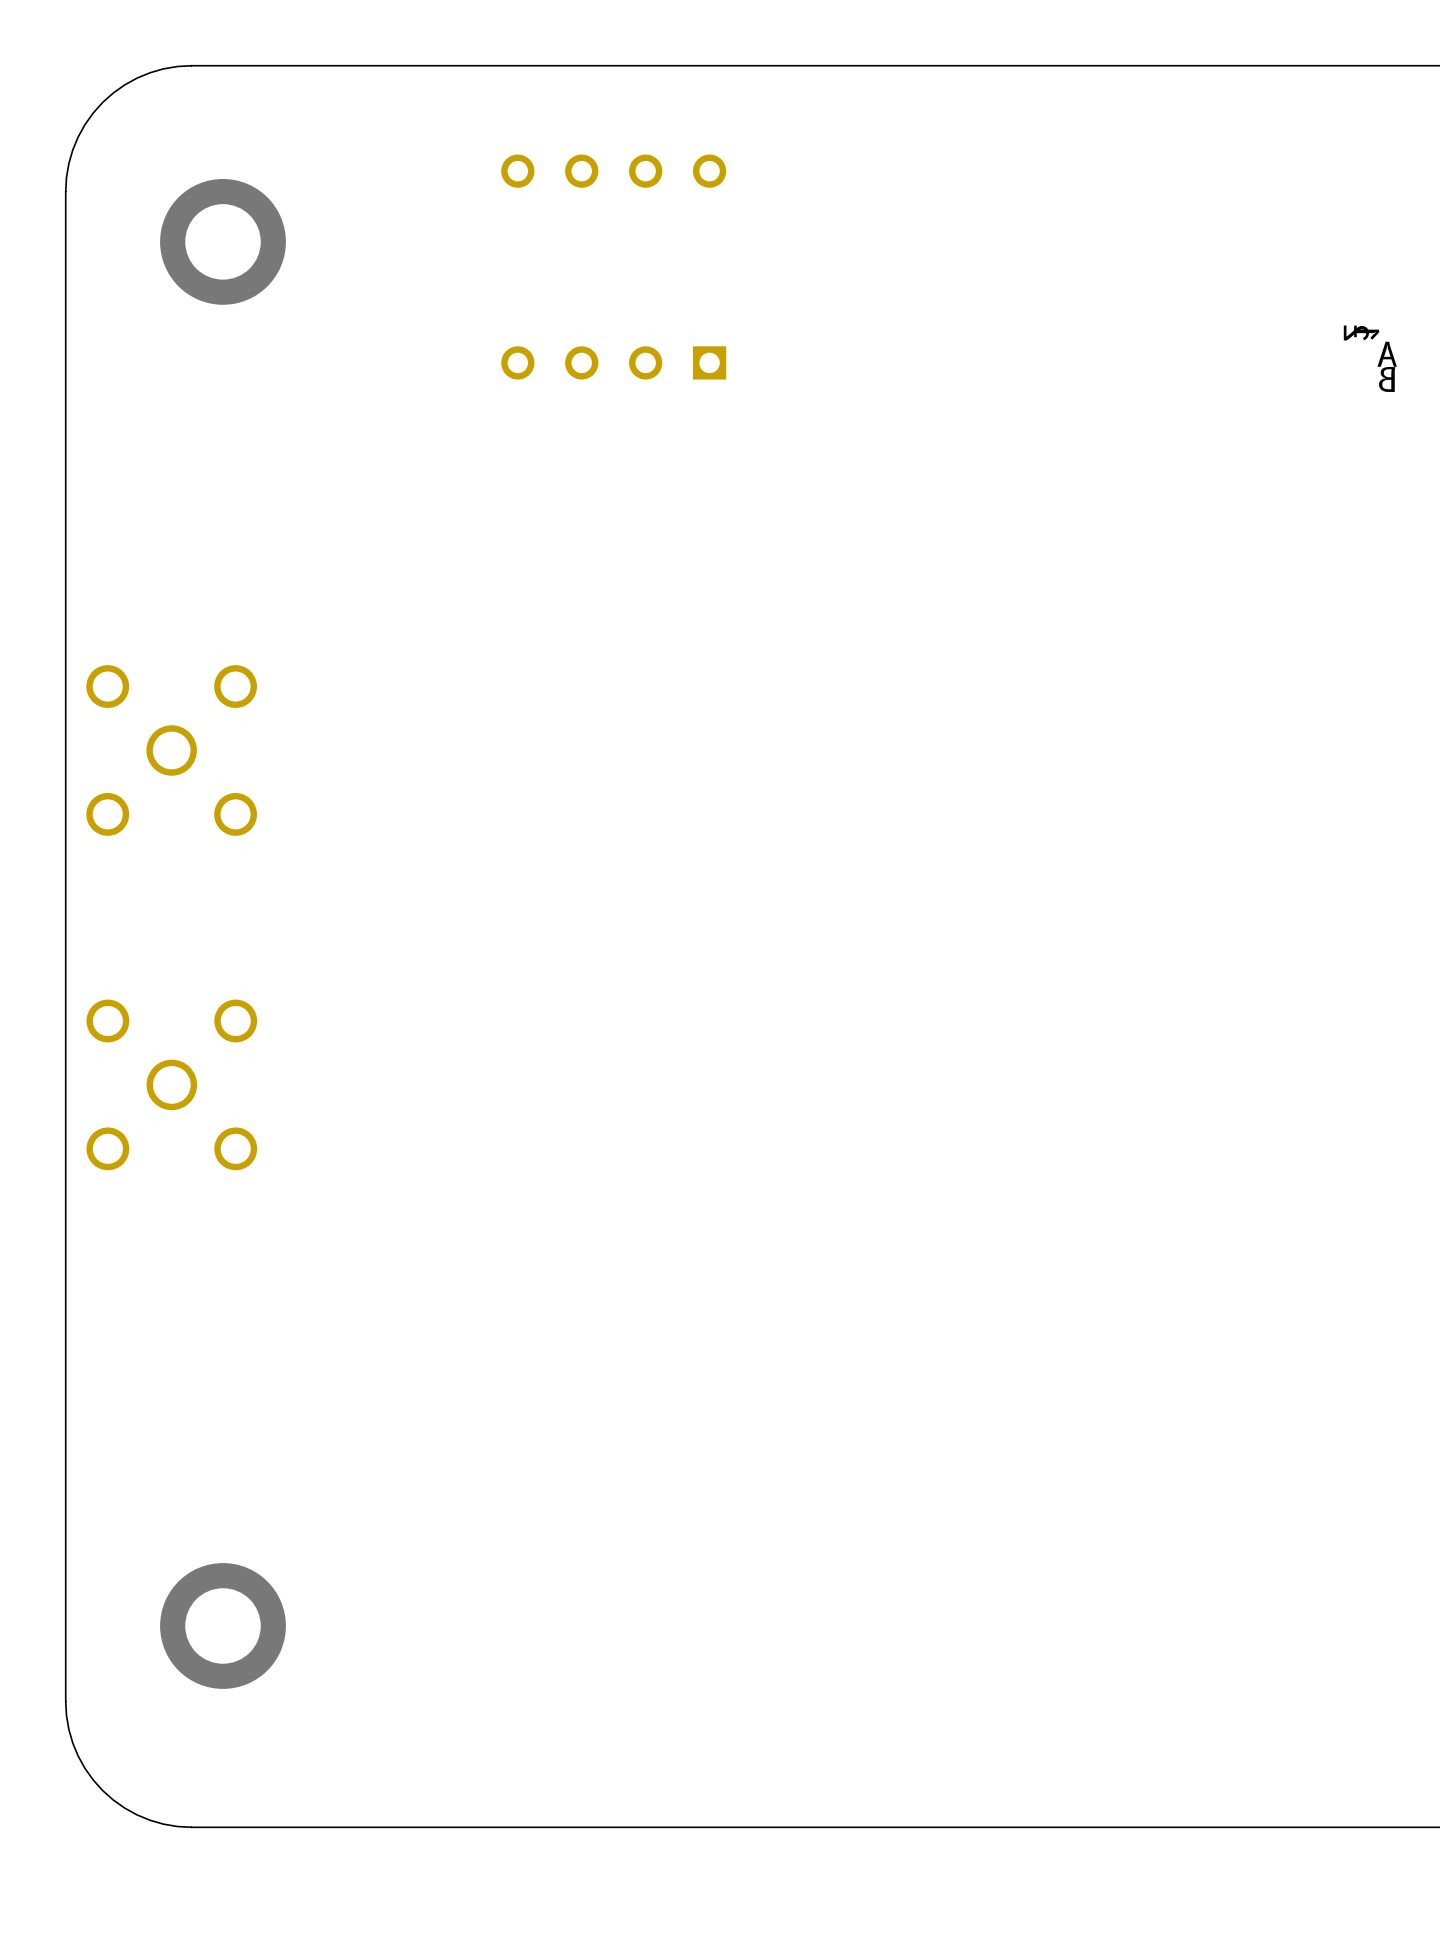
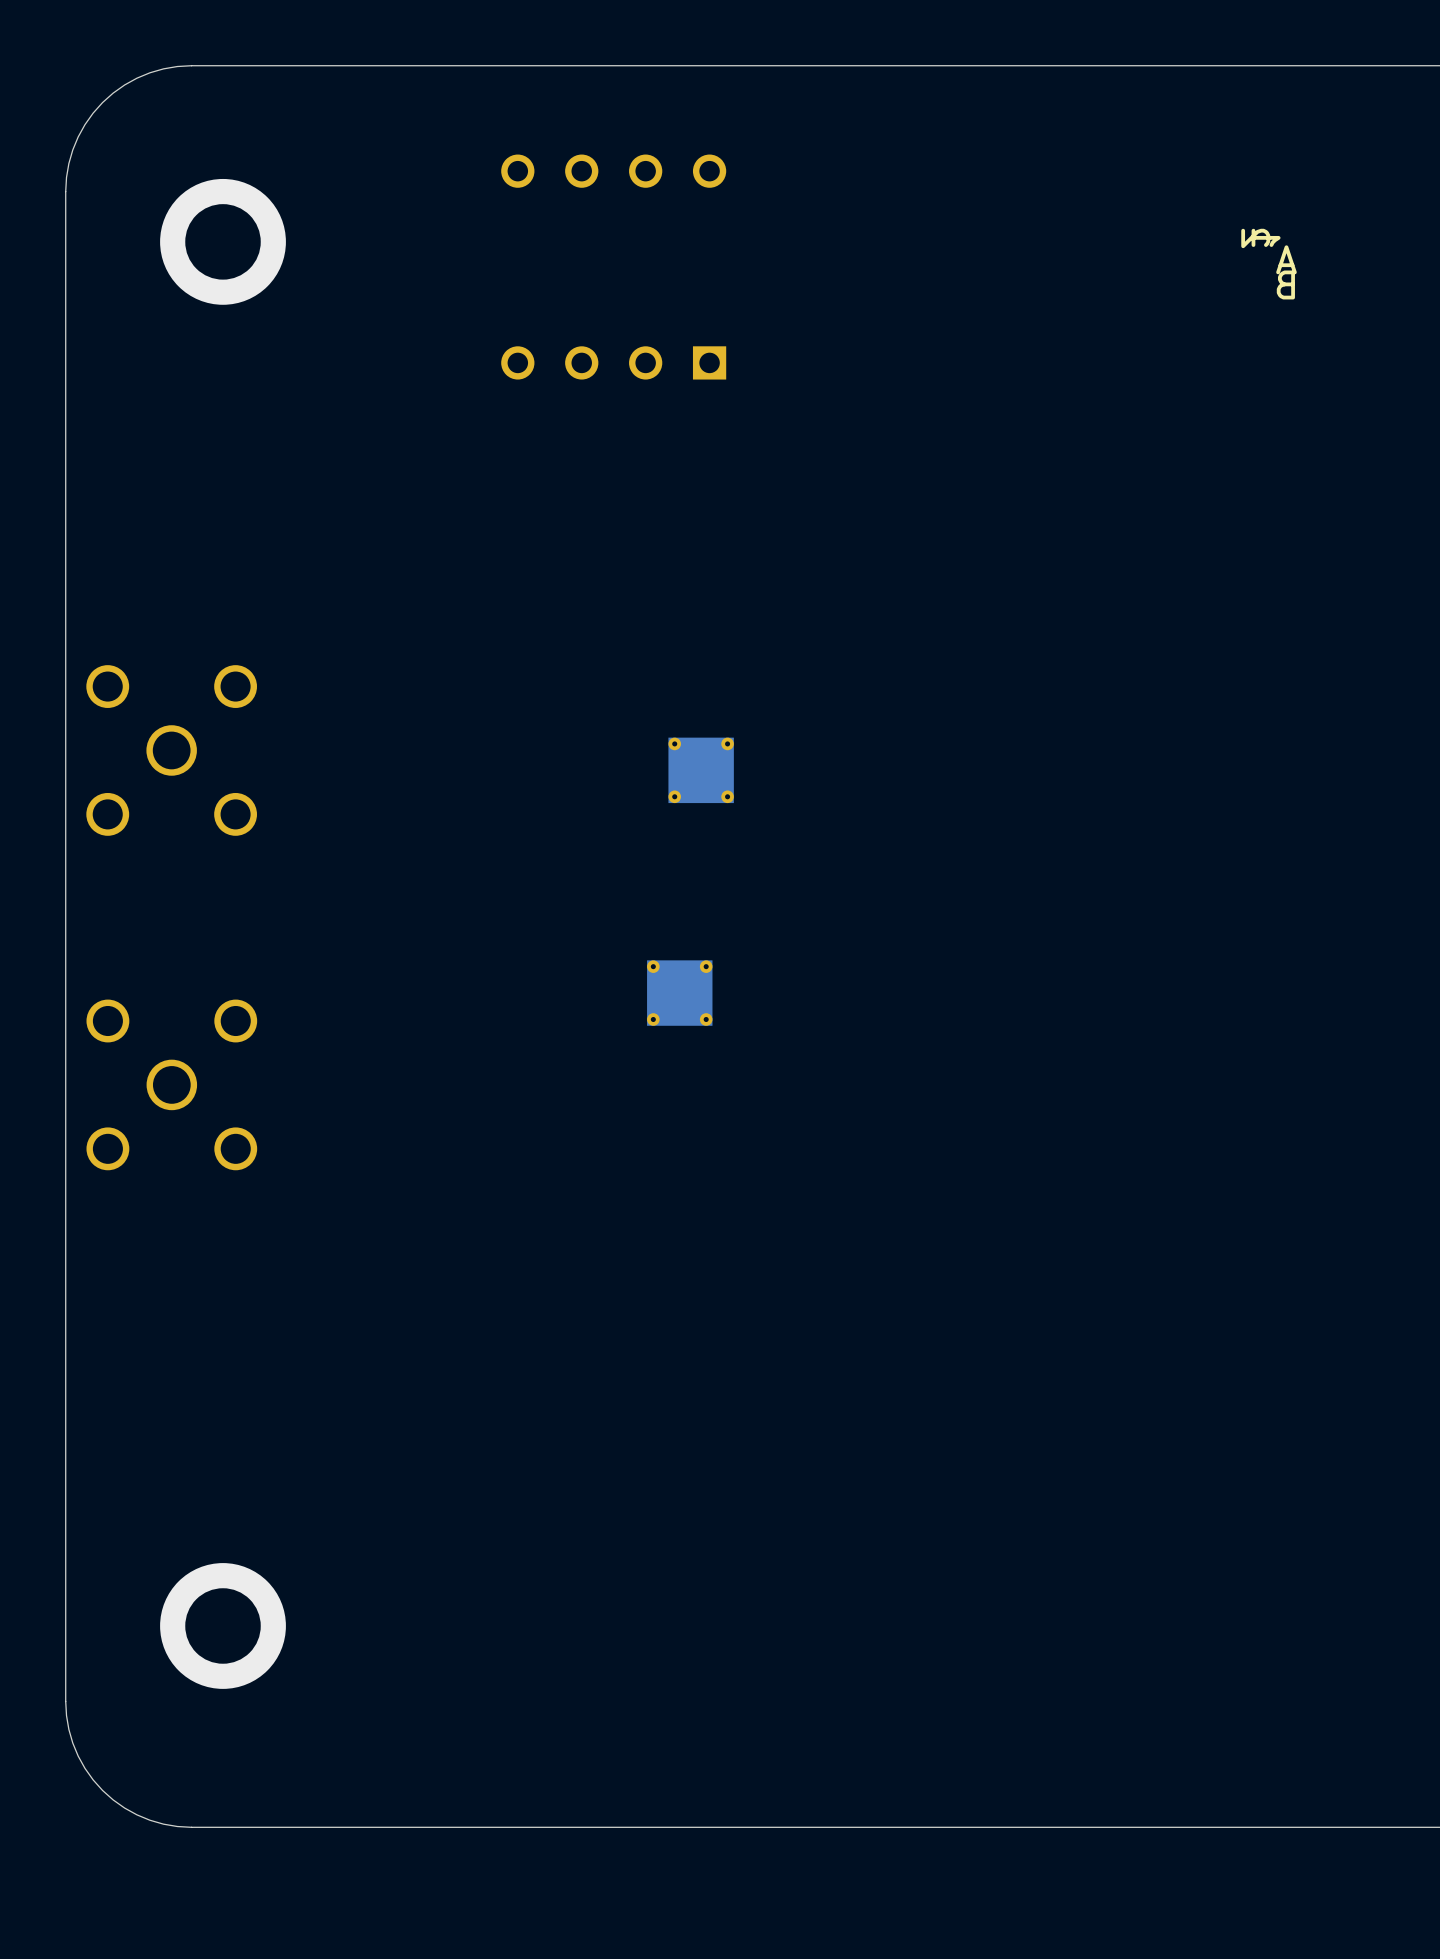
part position: (1370, 358) -> (1269, 264)
part: none -> (701, 770)
part: none -> (679, 993)

